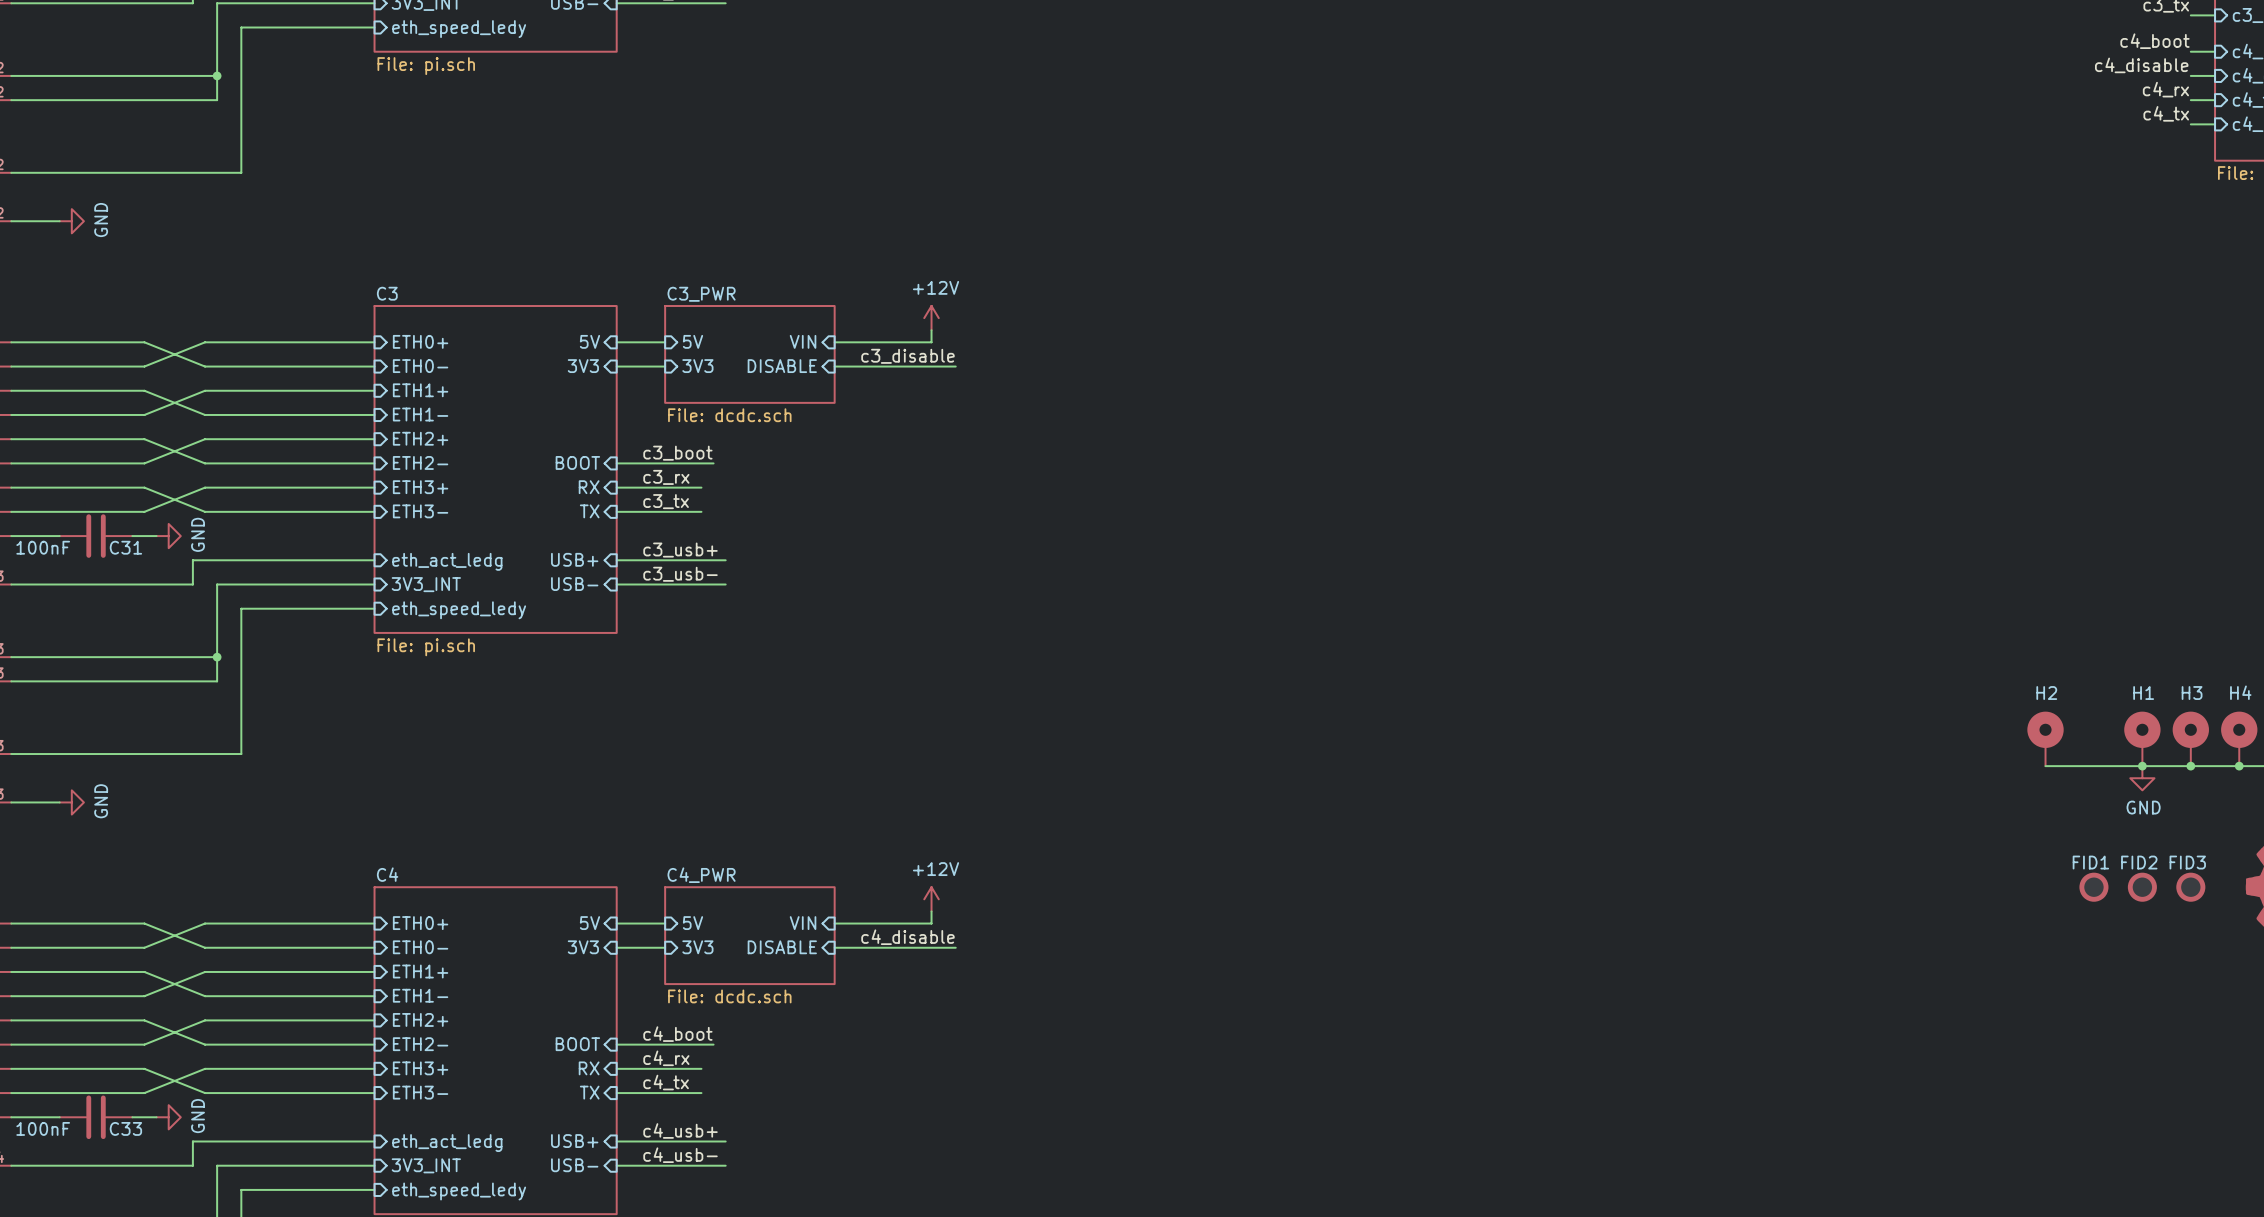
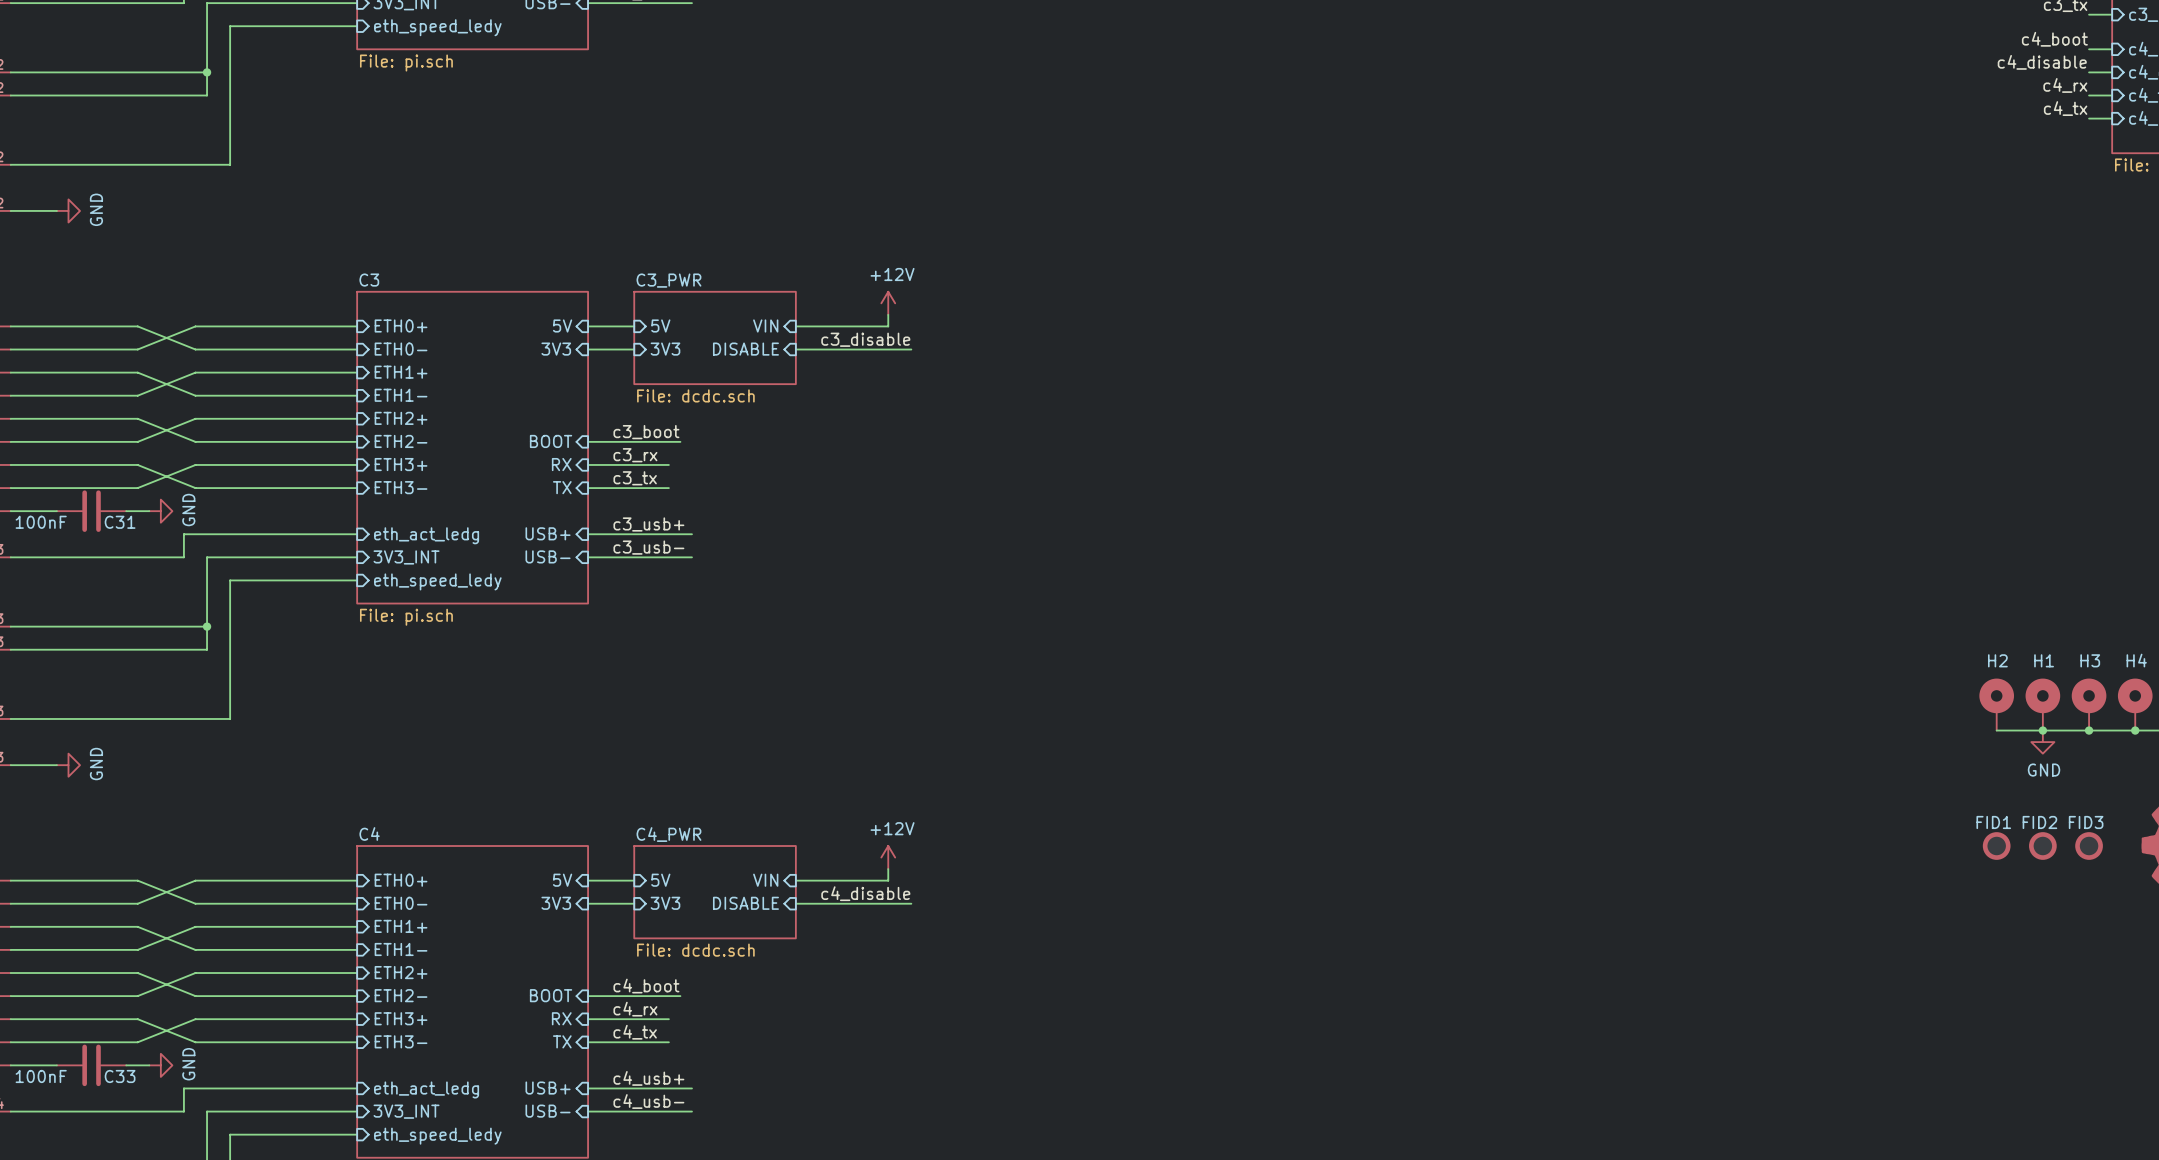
H2 position: (2045, 738) -> (1996, 704)
wire: (2045, 766) (2093, 766) -> none

